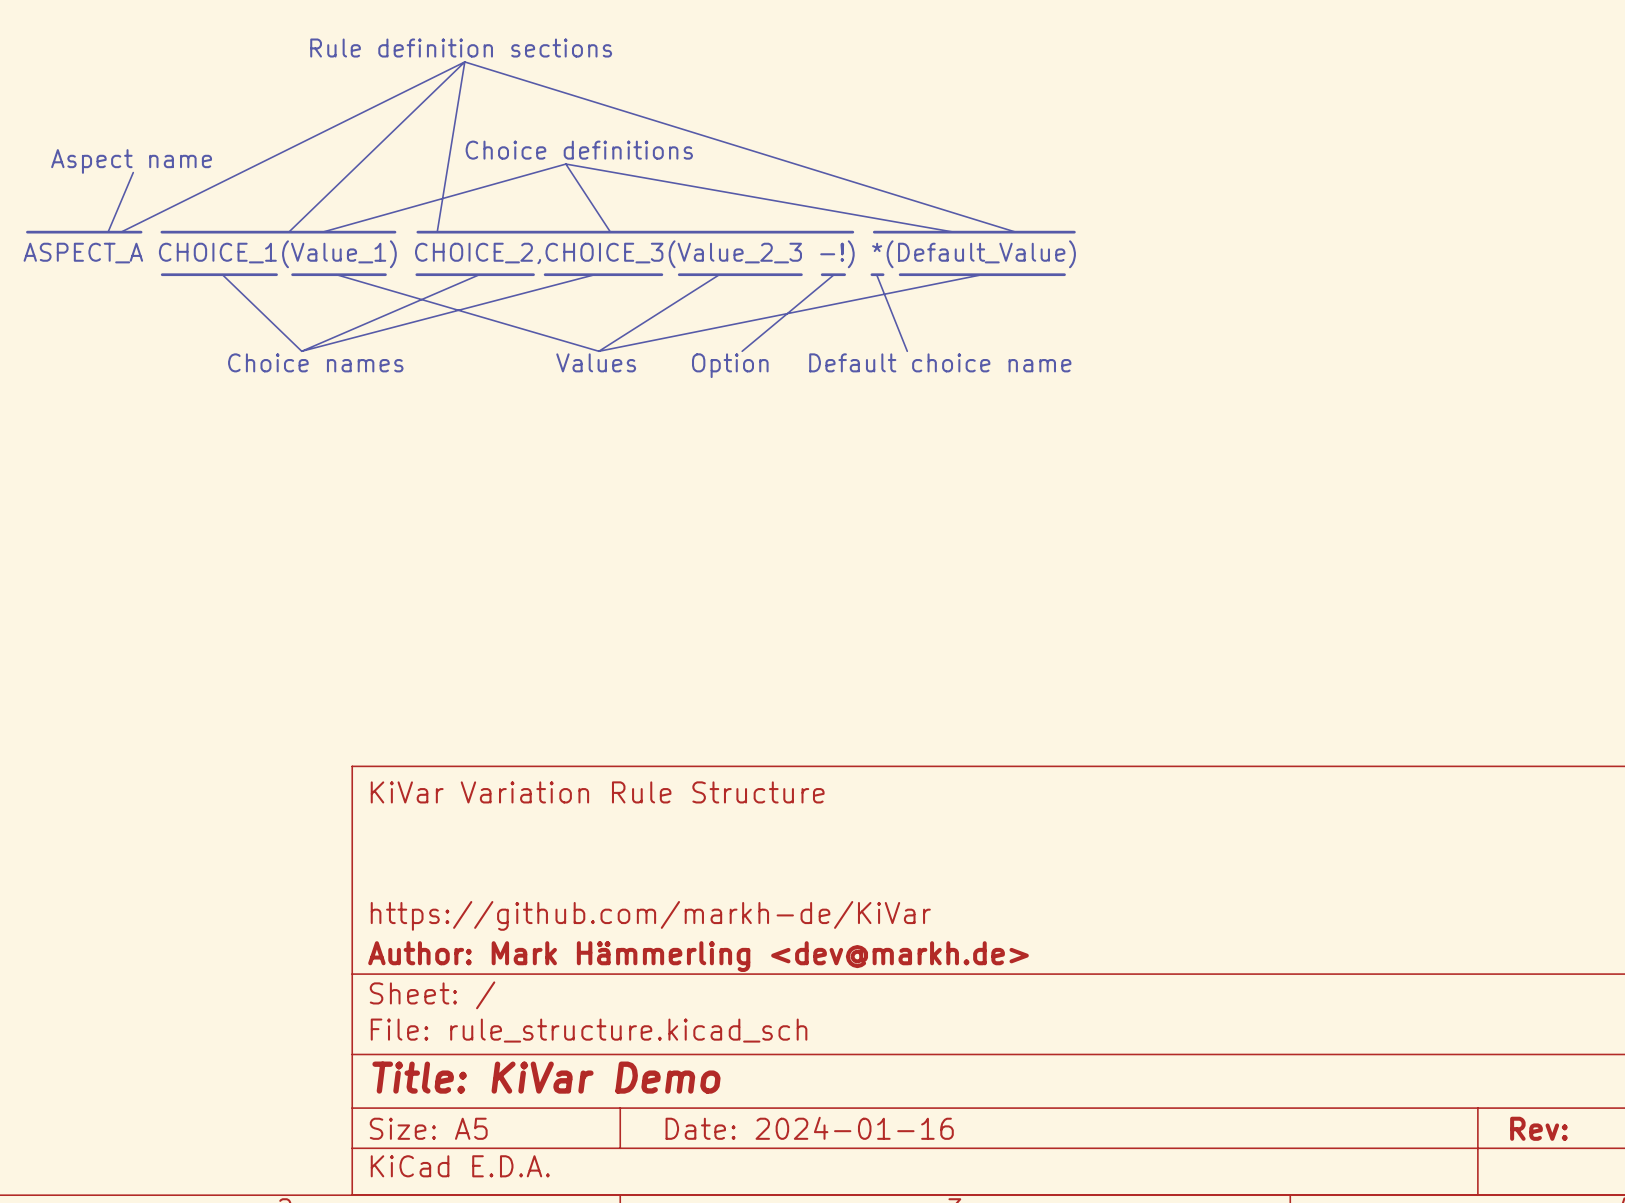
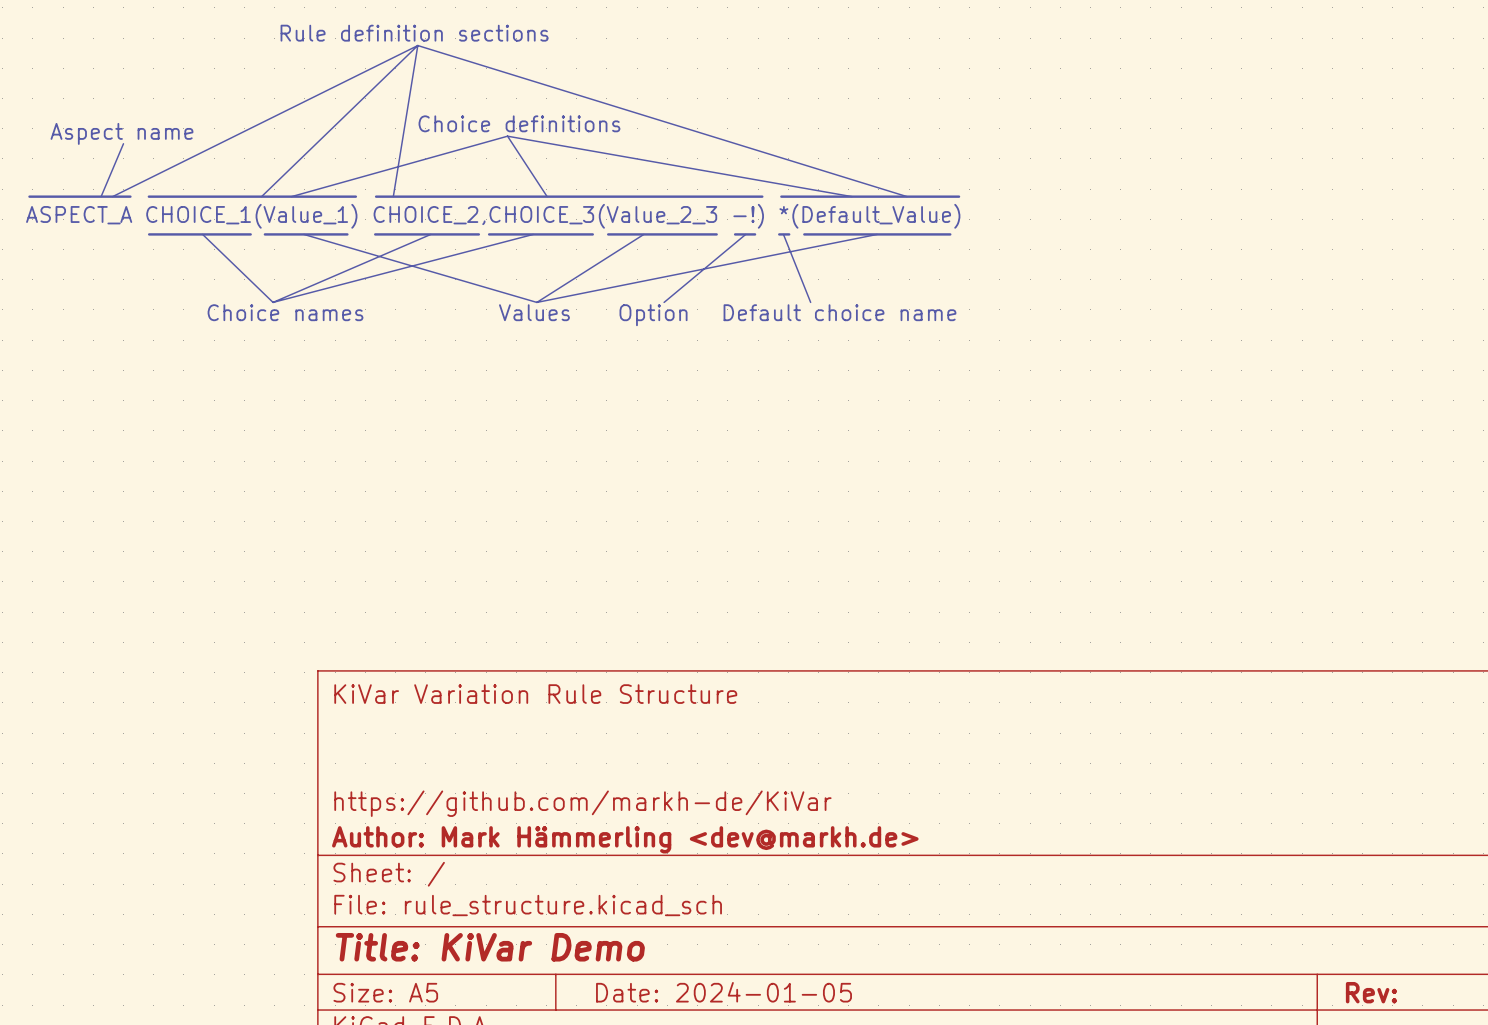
title block: Date: 2024-01-16 (809, 1128) -> Date: 2024-01-05 (724, 992)

